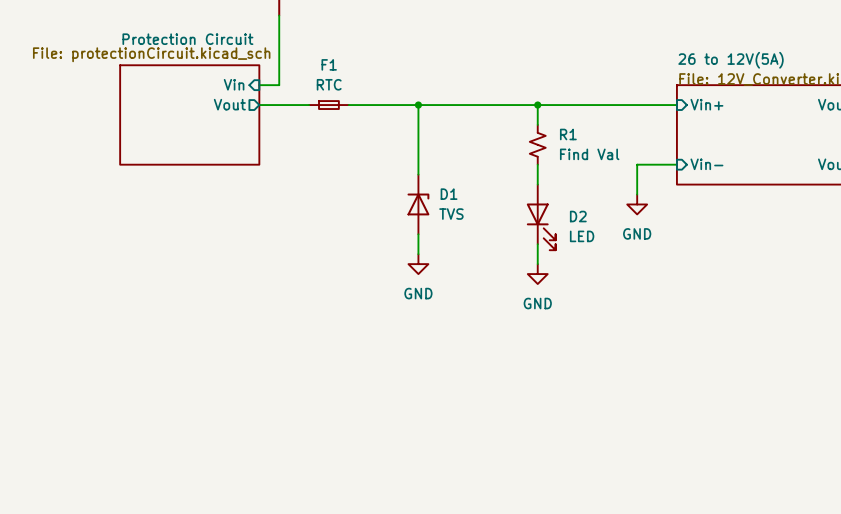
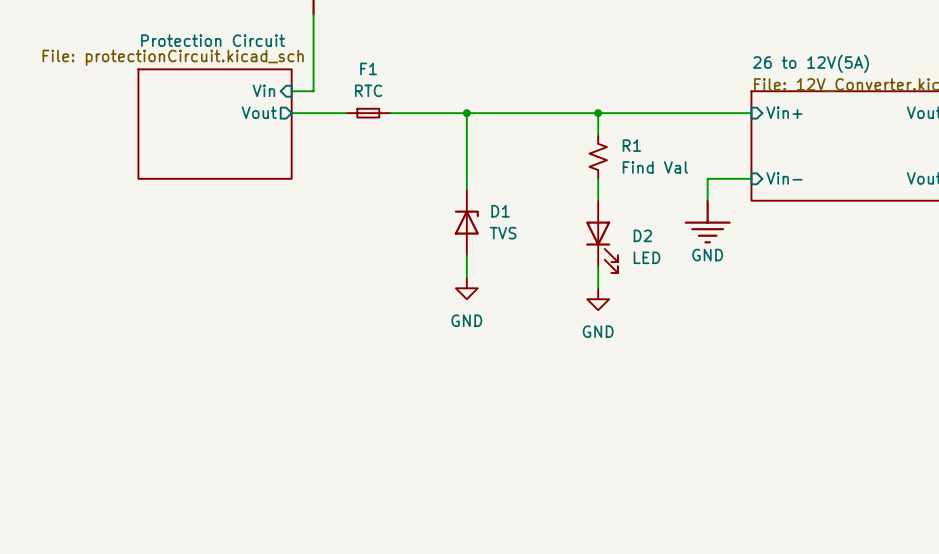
power symbol shape: [627, 194, 648, 215] -> [684, 199, 731, 244]

